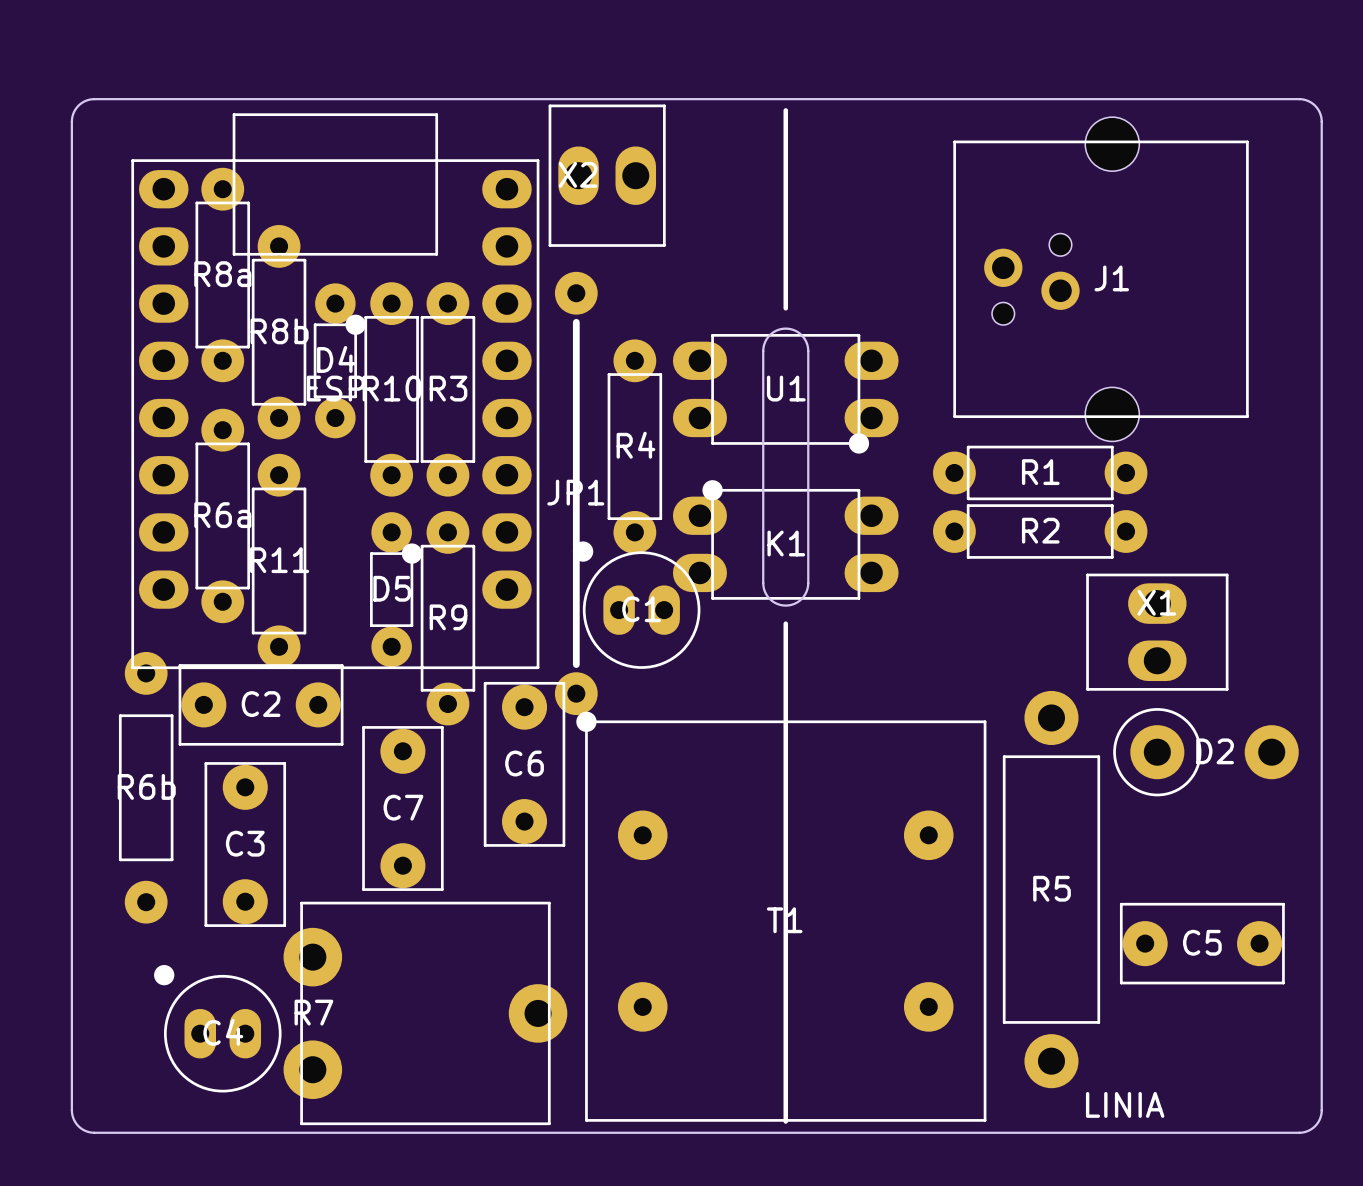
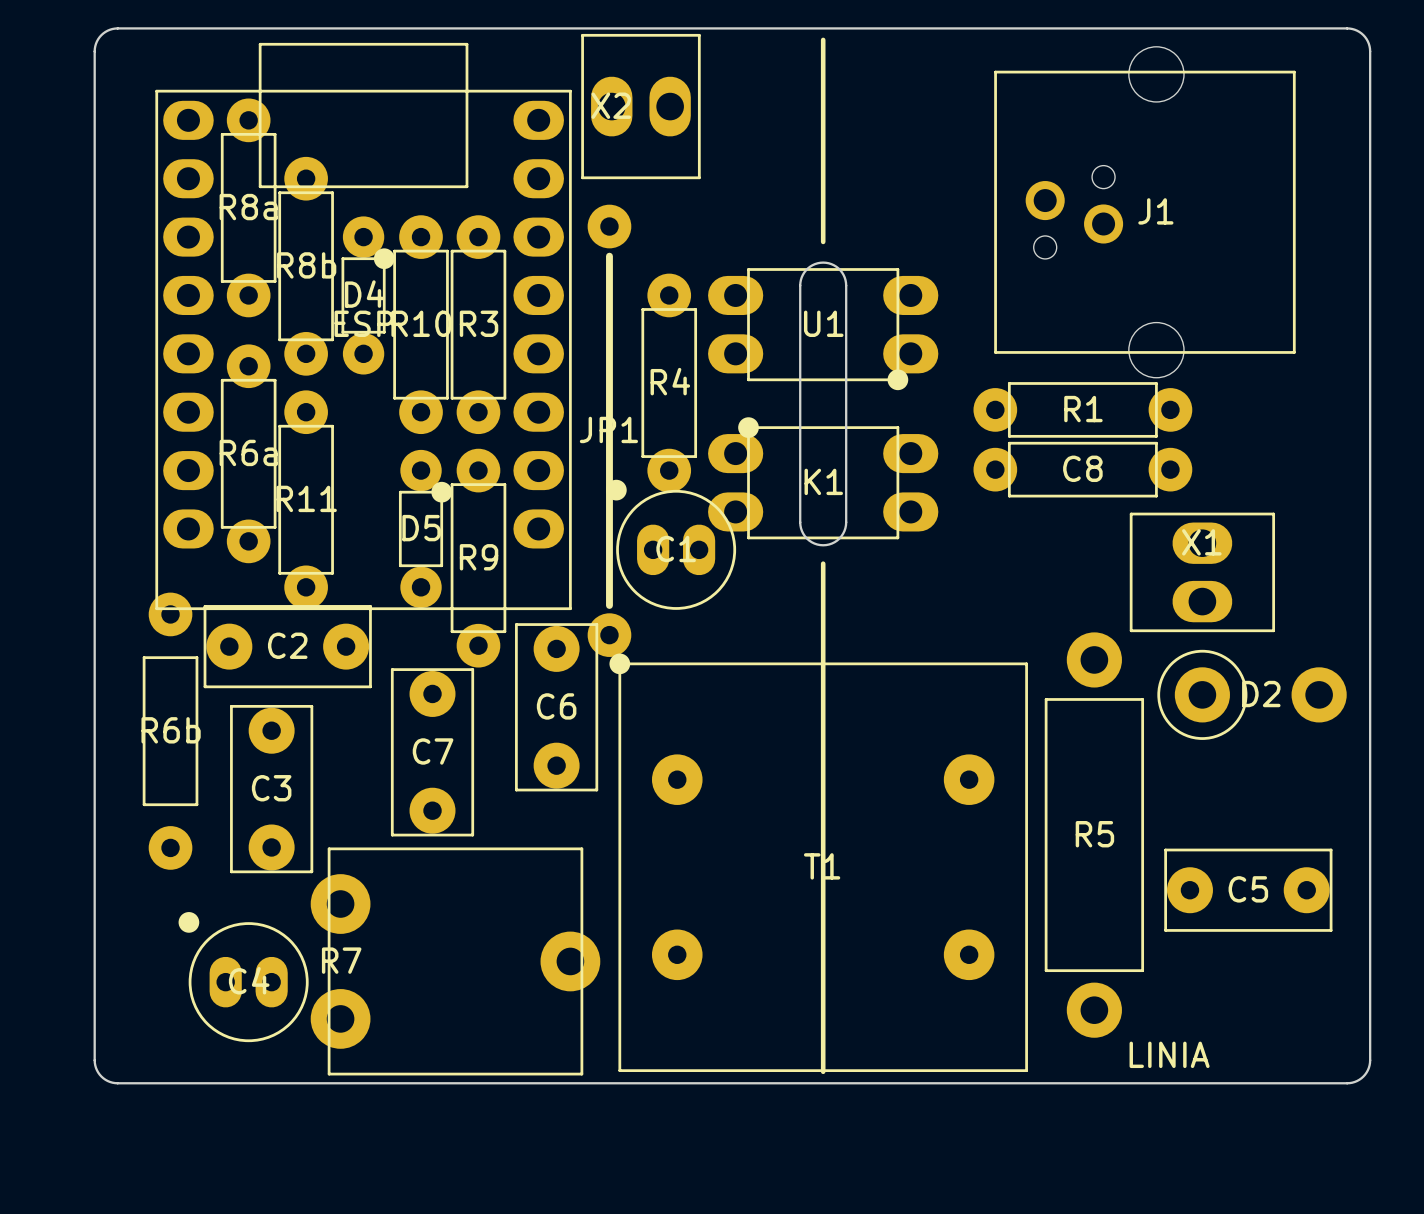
R2 name: R2 (1040, 530) -> C8 (1082, 468)

